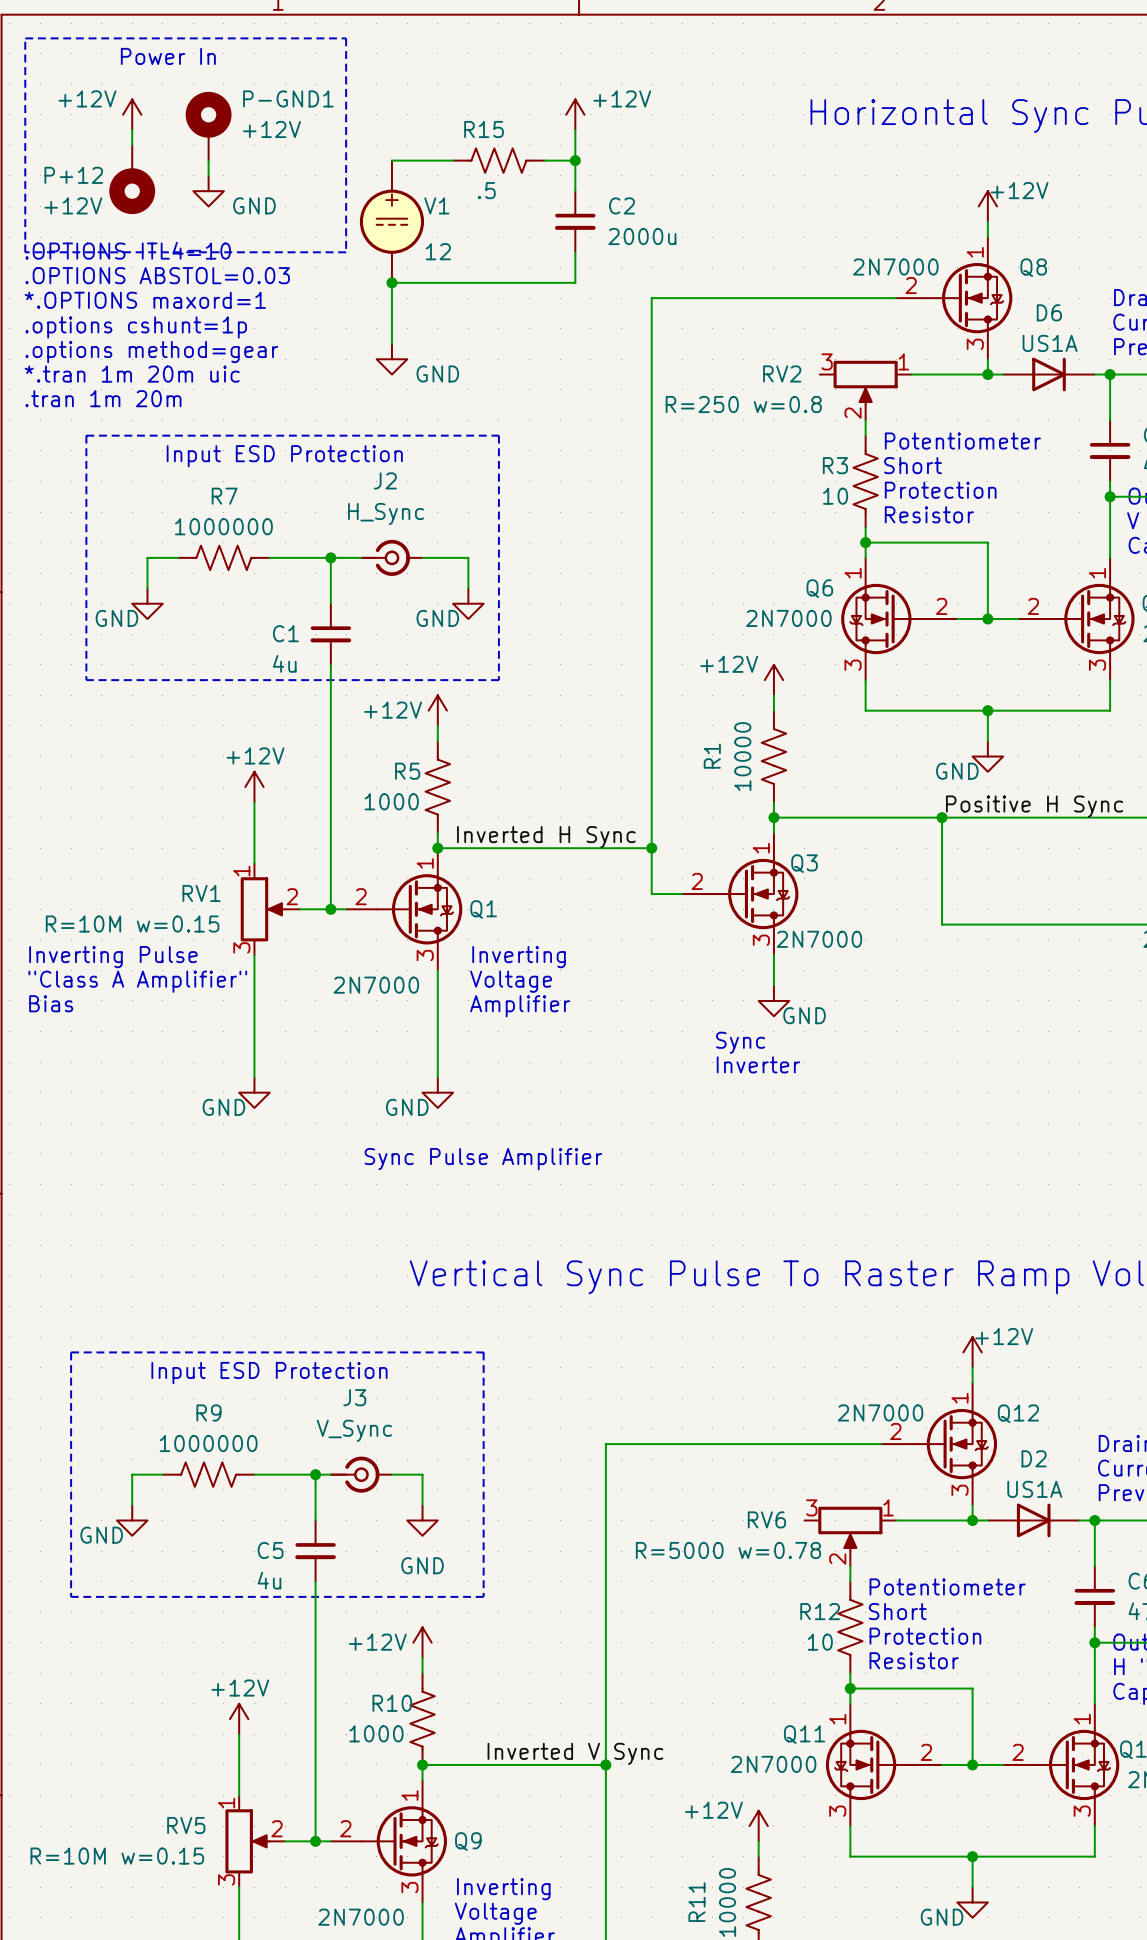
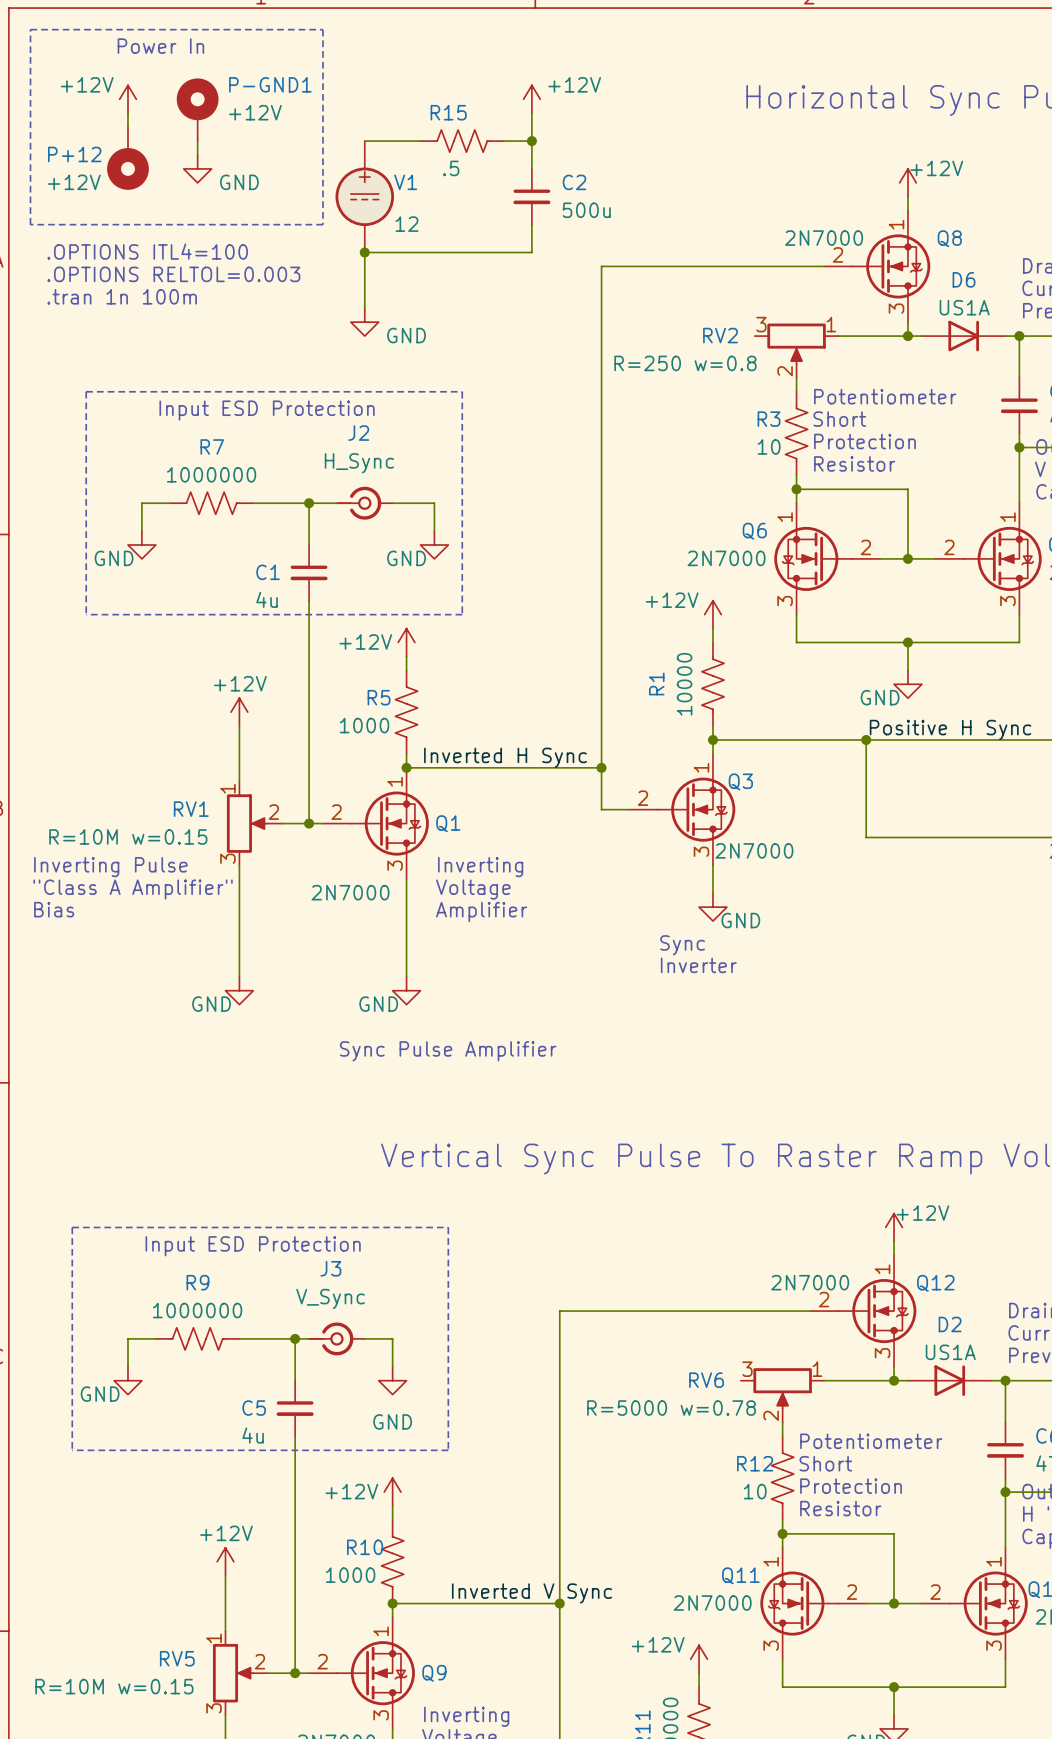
C2 value: 2000u (642, 236) -> 500u (586, 210)
text: .OPTIONS ITL4=10 (128, 250) -> none
text: .OPTIONS ABSTOL=0.03 (157, 275) -> none
text: none -> .OPTIONS ITL4=100 (147, 251)
text: *.OPTIONS maxord=1 (145, 300) -> none
text: none -> .OPTIONS RELTOL=0.003 (173, 274)
text: .options cshunt=1p (136, 327) -> none
text: none -> .tran 1n 100m (122, 296)
text: .options method=gear (151, 352) -> none
text: *.tran 1m 20m uic (132, 374) -> none
text: .tran 1m 20m (103, 398) -> none

